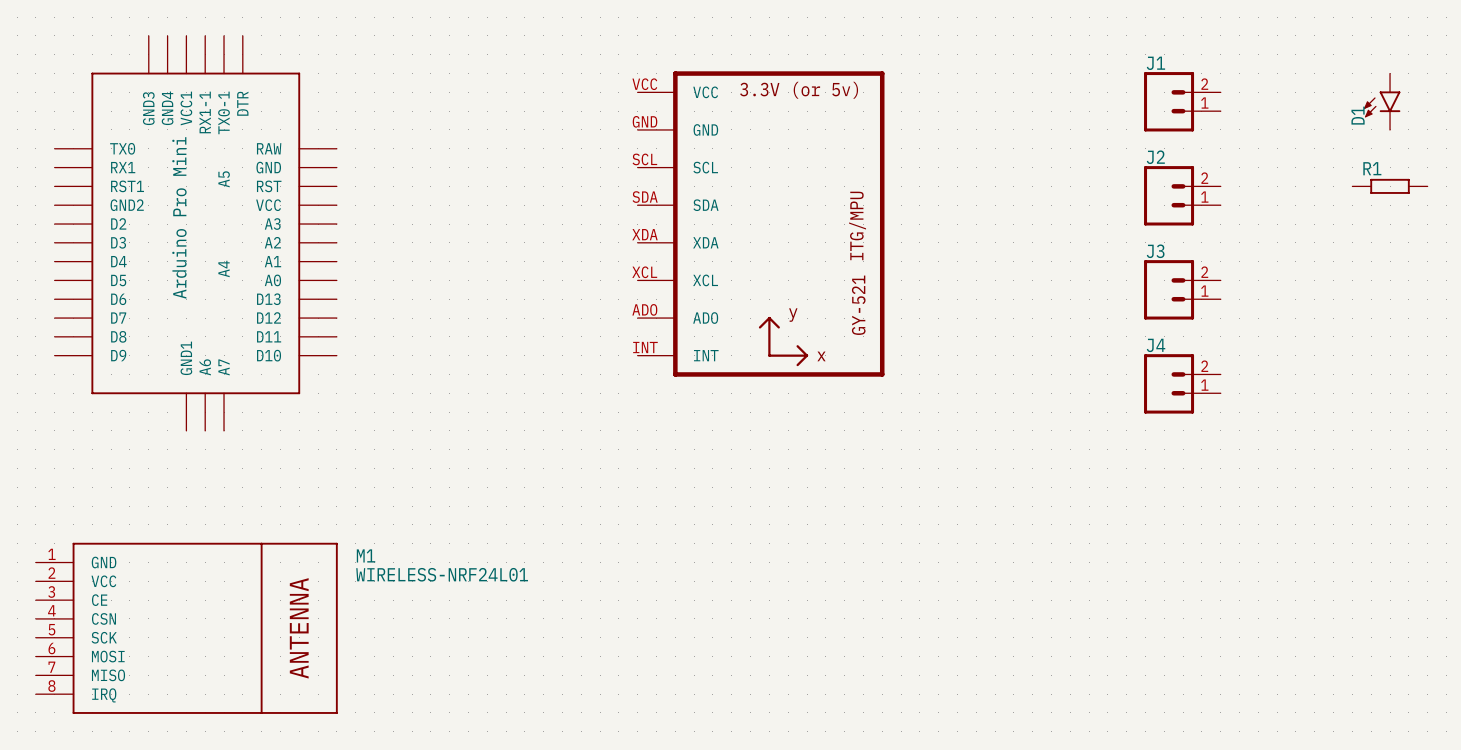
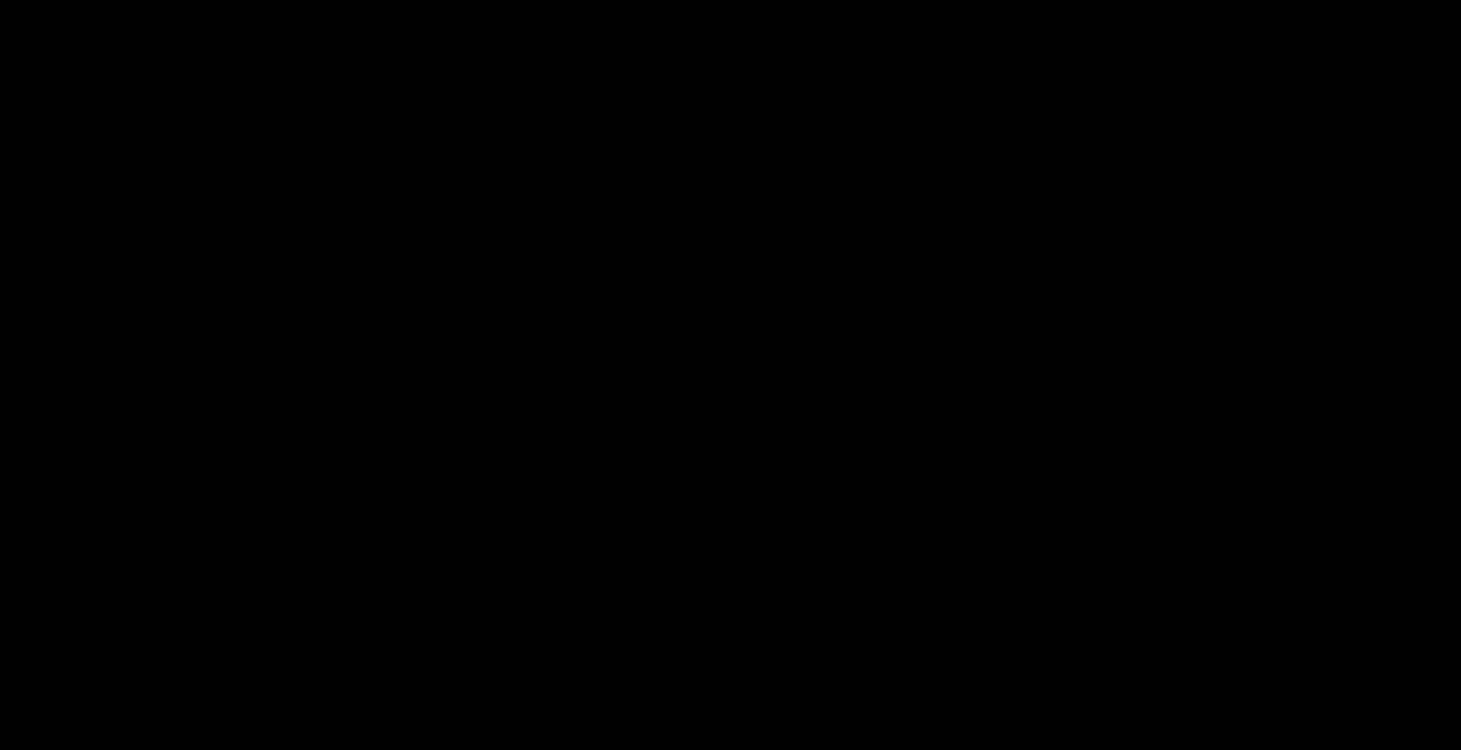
J1: (1182, 101) -> none
D1: (1382, 101) -> none
R1: (1390, 186) -> none
J2: (1182, 195) -> none
part: (761, 224) -> none
part: (195, 233) -> none
J3: (1182, 289) -> none
J4: (1182, 383) -> none
M1: WIRELESS-NRF24L01 (186, 628) -> none

